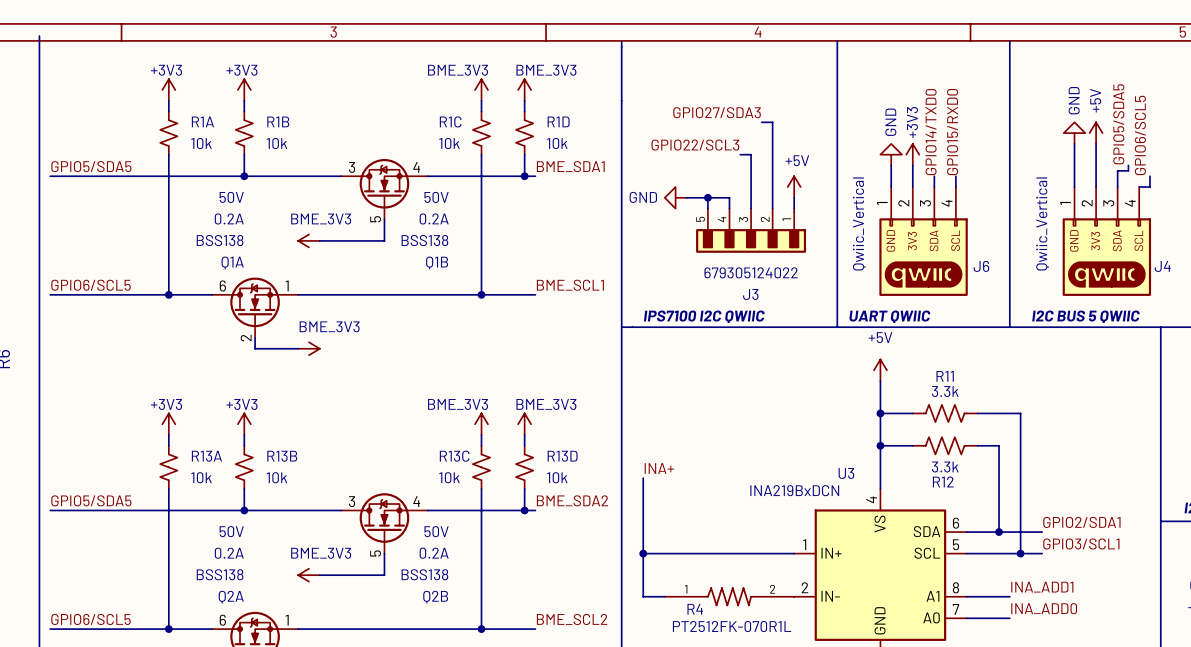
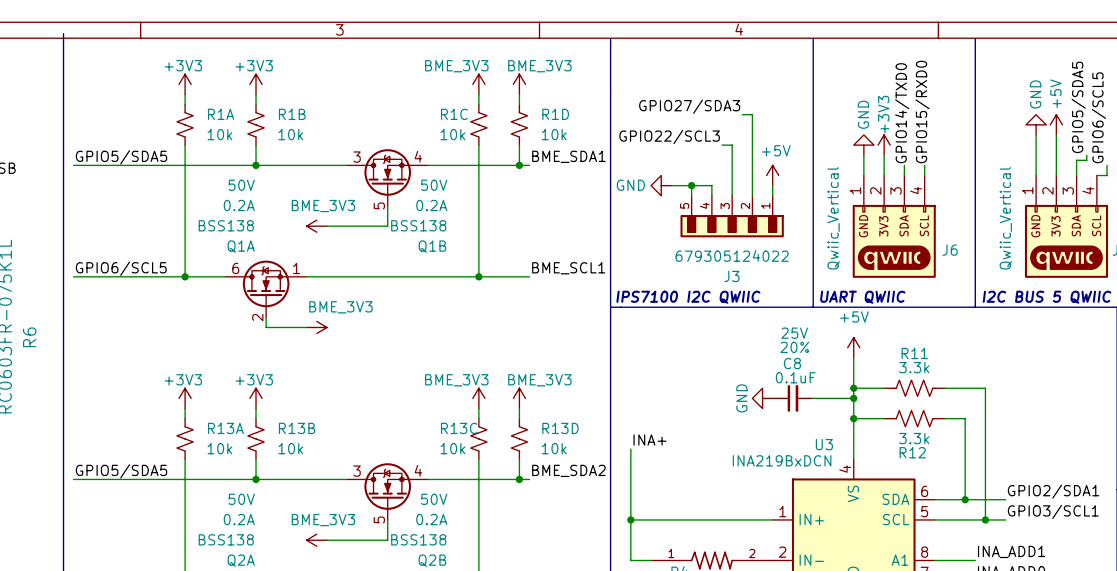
power symbol: none -> GND (762, 398)
C8: none -> 0.1uF (792, 398)
wire: none -> (813, 398) (853, 398)
junction: none -> (853, 398)

